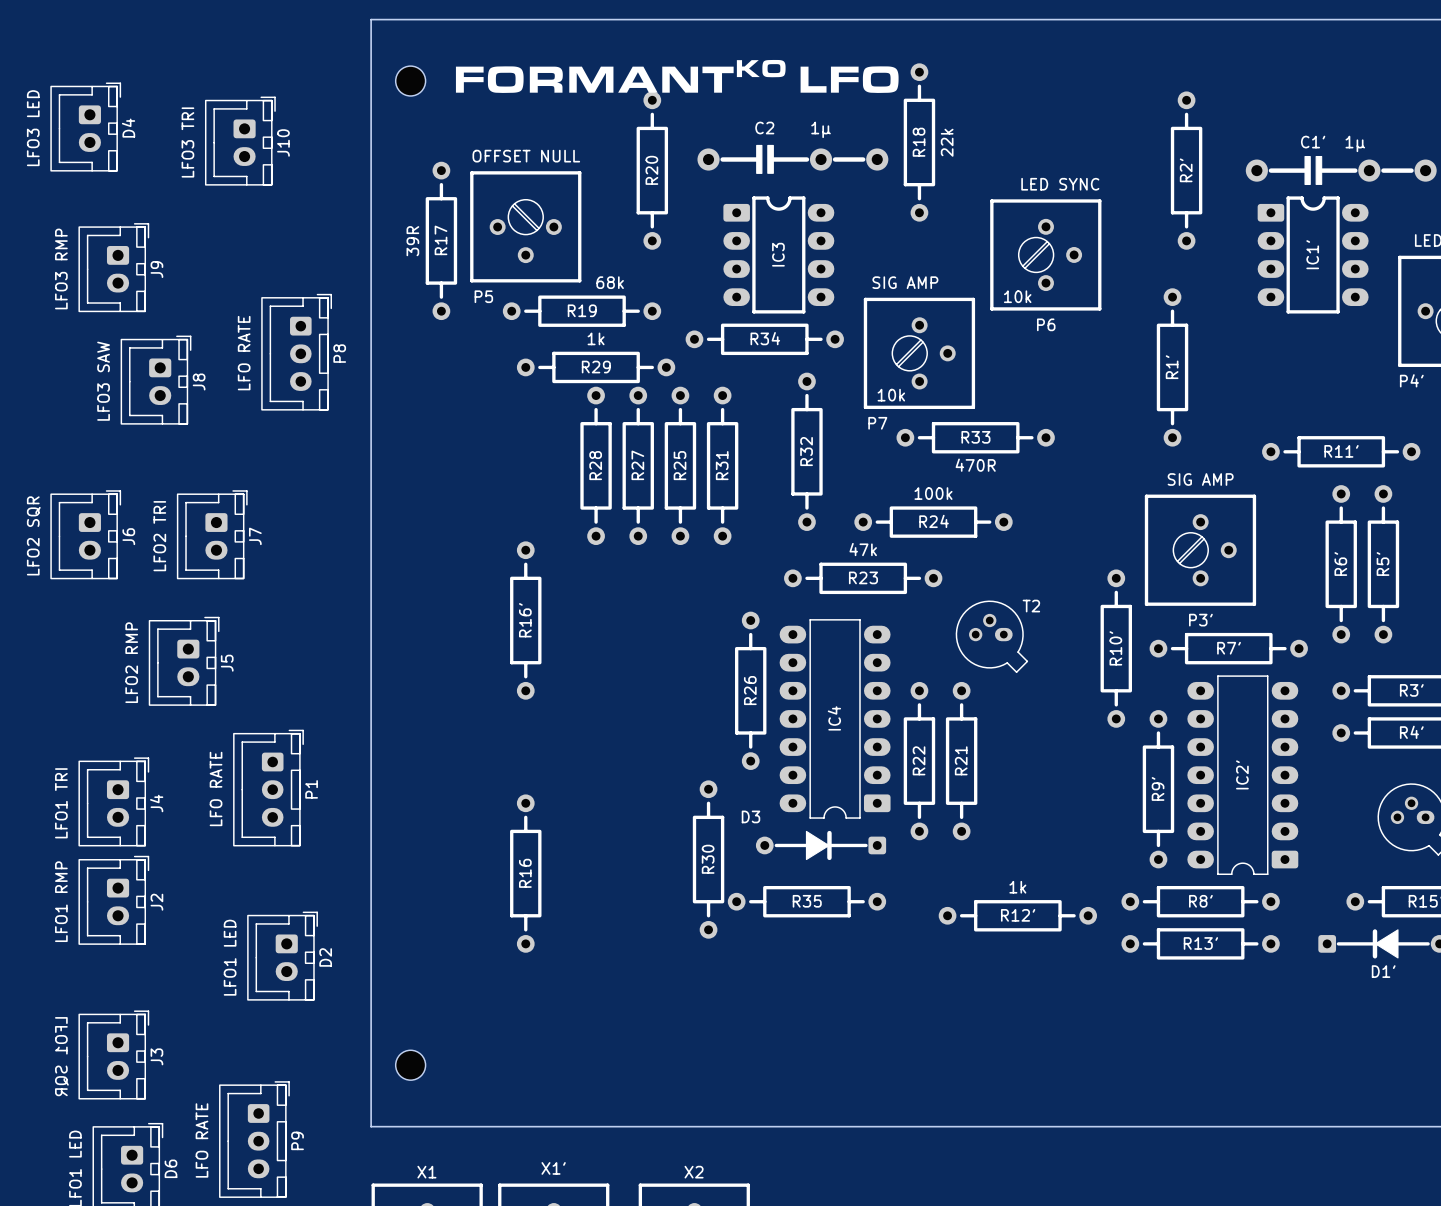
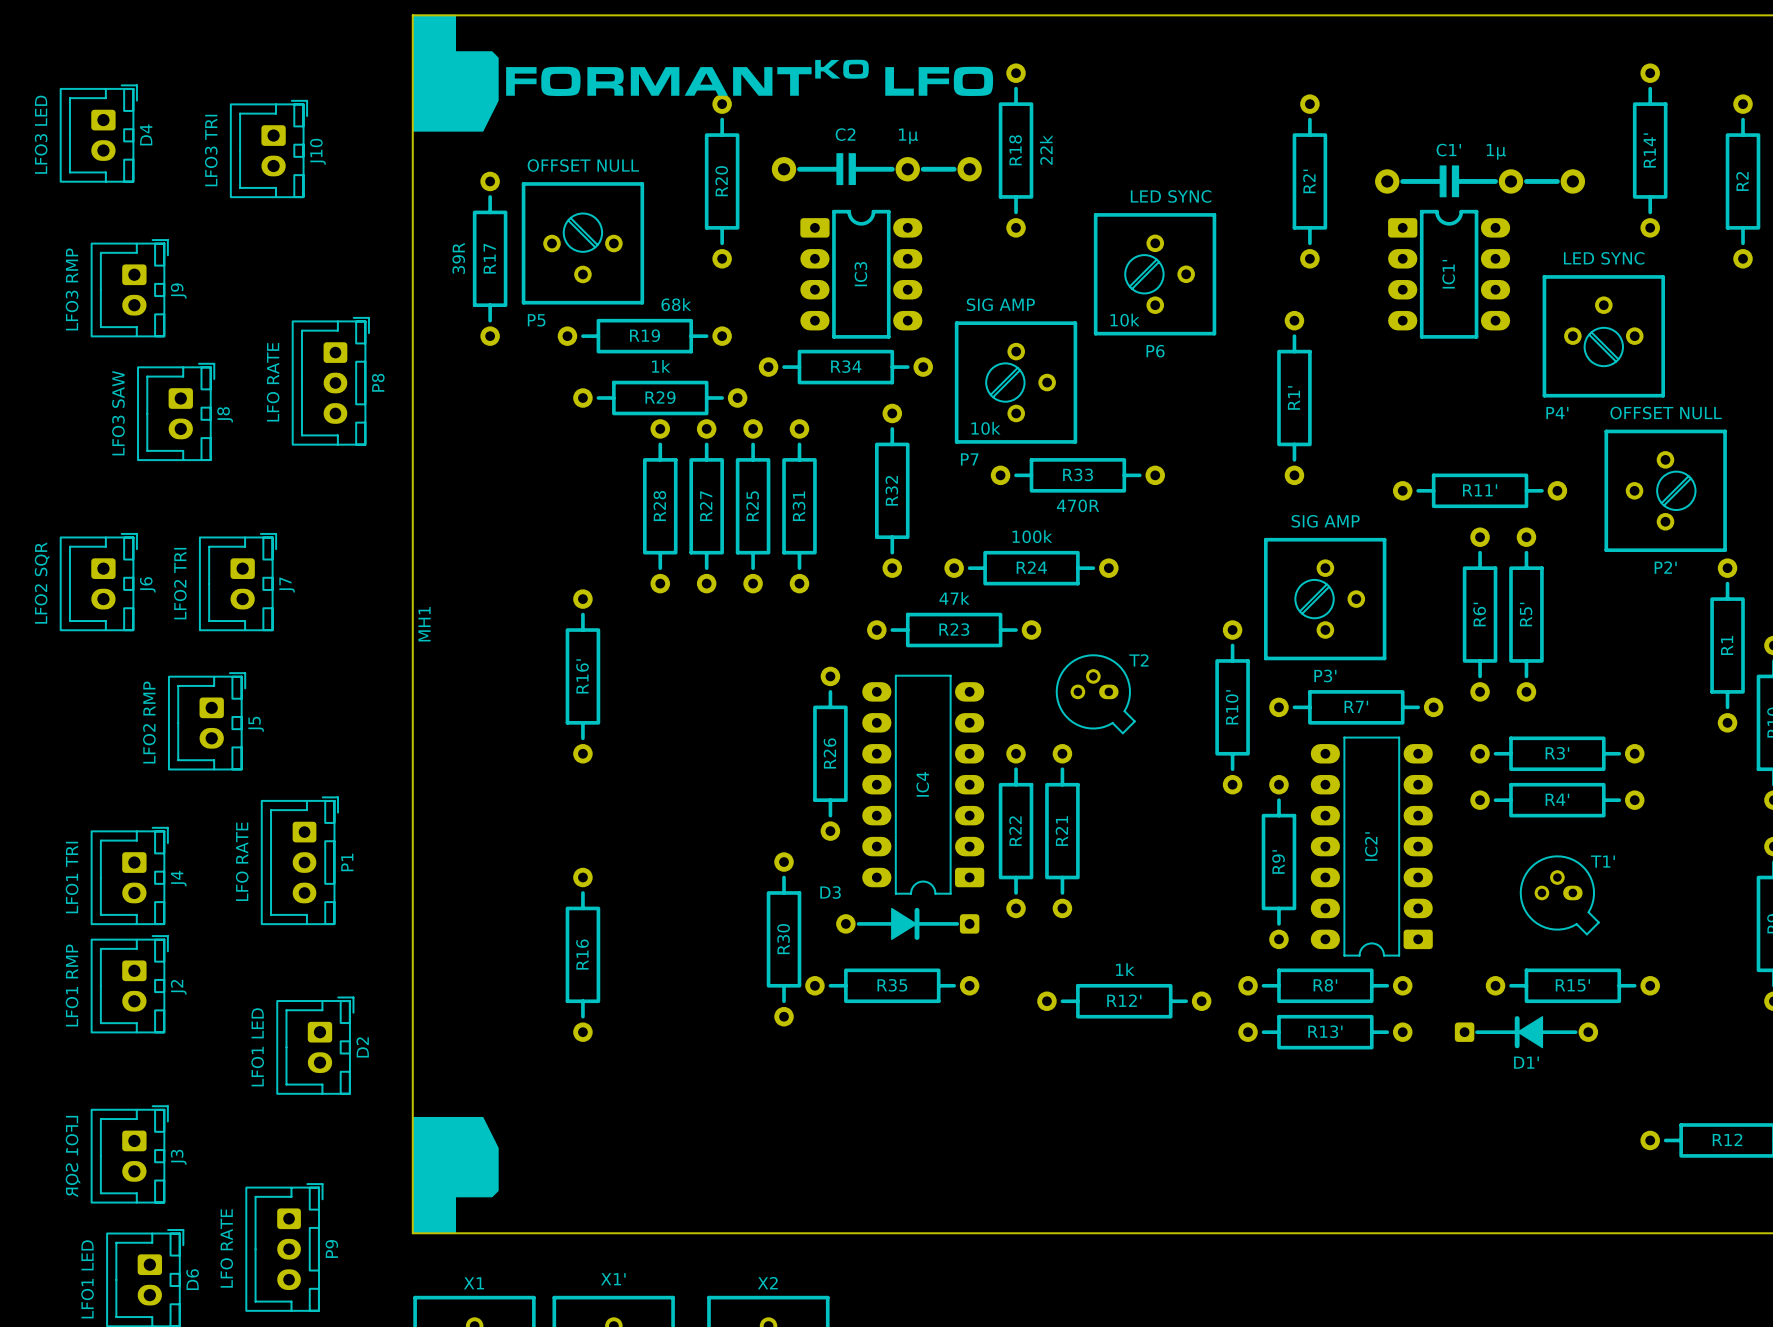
part: (410, 81) -> none
MH1: none -> (455, 624)
part: (410, 1065) -> none

